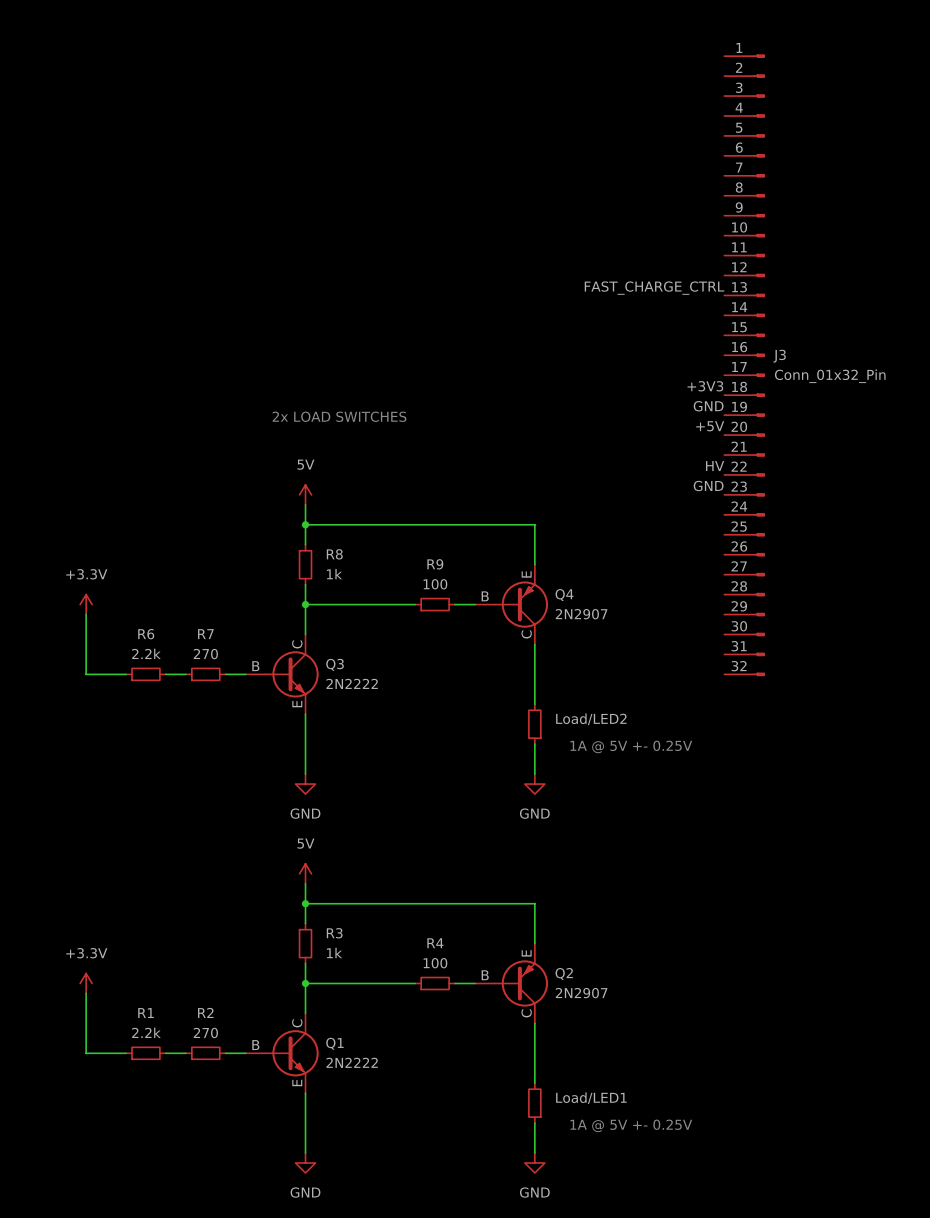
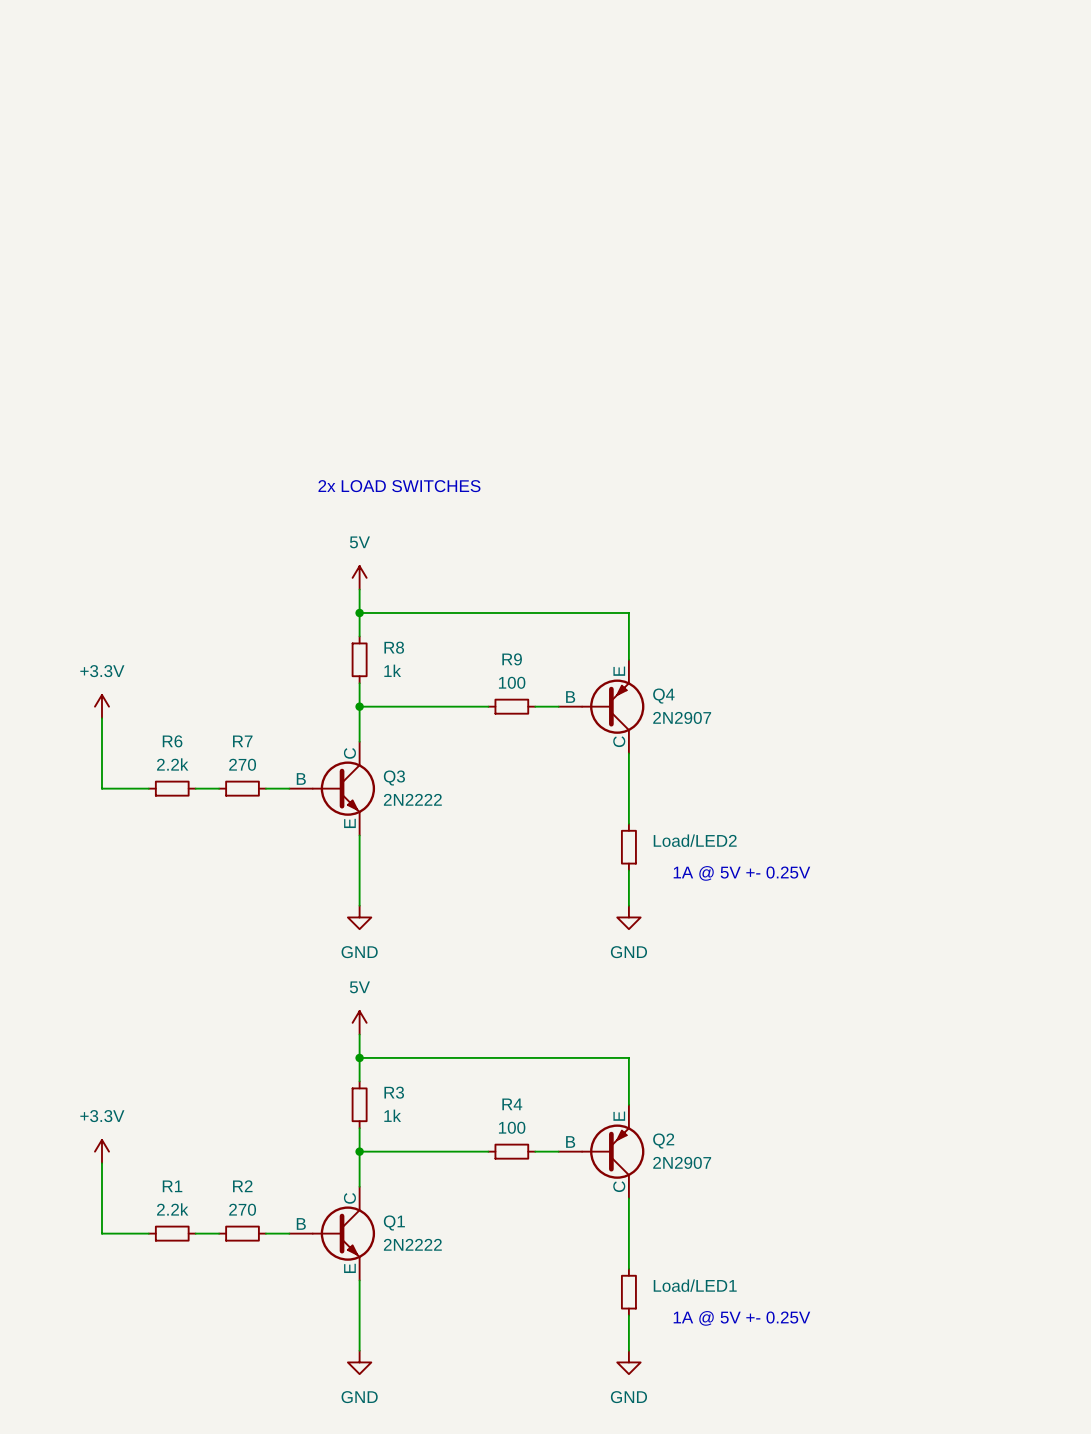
label: FAST_CHARGE_CTRL (654, 288) -> none
J3: Conn_01x32_Pin (744, 365) -> none
label: +3V3 (705, 386) -> none
label: GND (708, 406) -> none
label: +5V (710, 426) -> none
label: HV (715, 466) -> none
label: GND (708, 486) -> none

